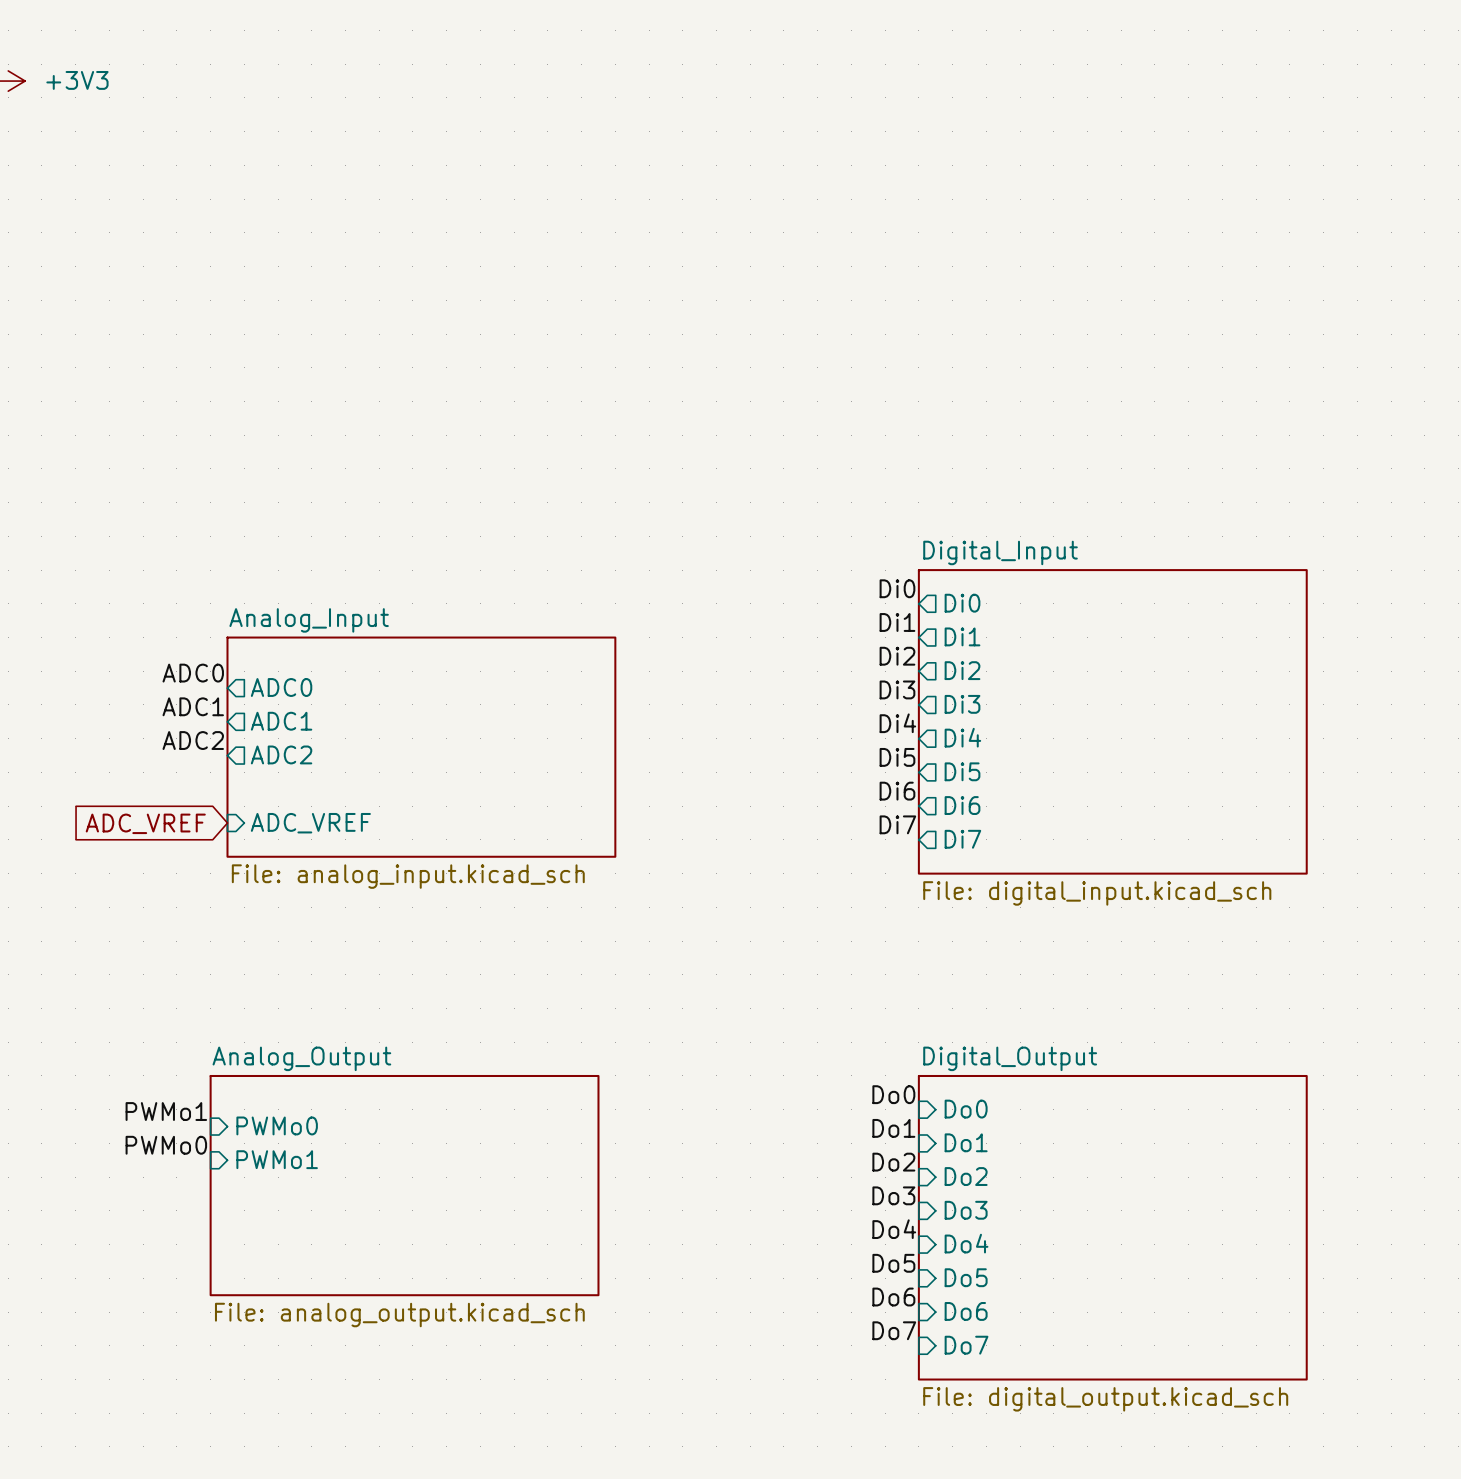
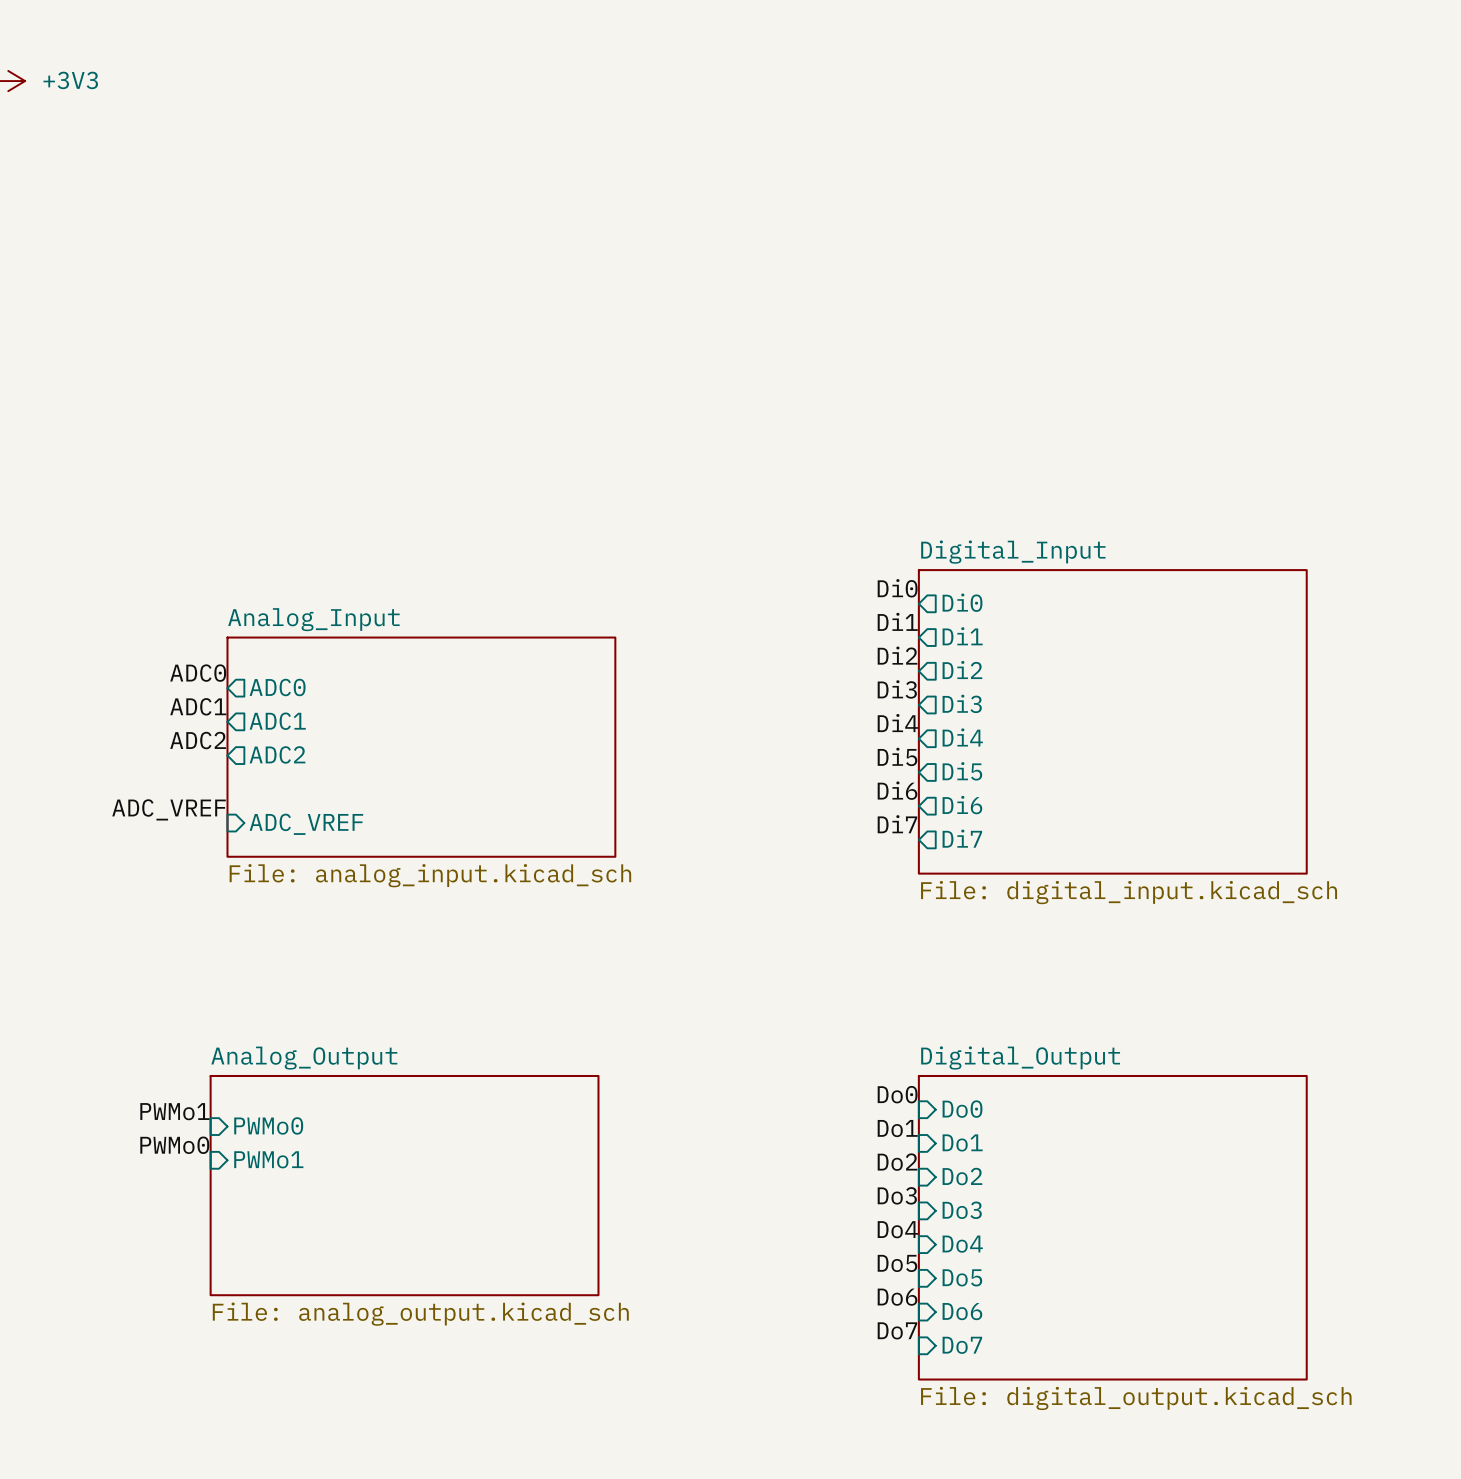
label: none -> ADC_VREF (169, 809)
global label: ADC_VREF (145, 823) -> none

